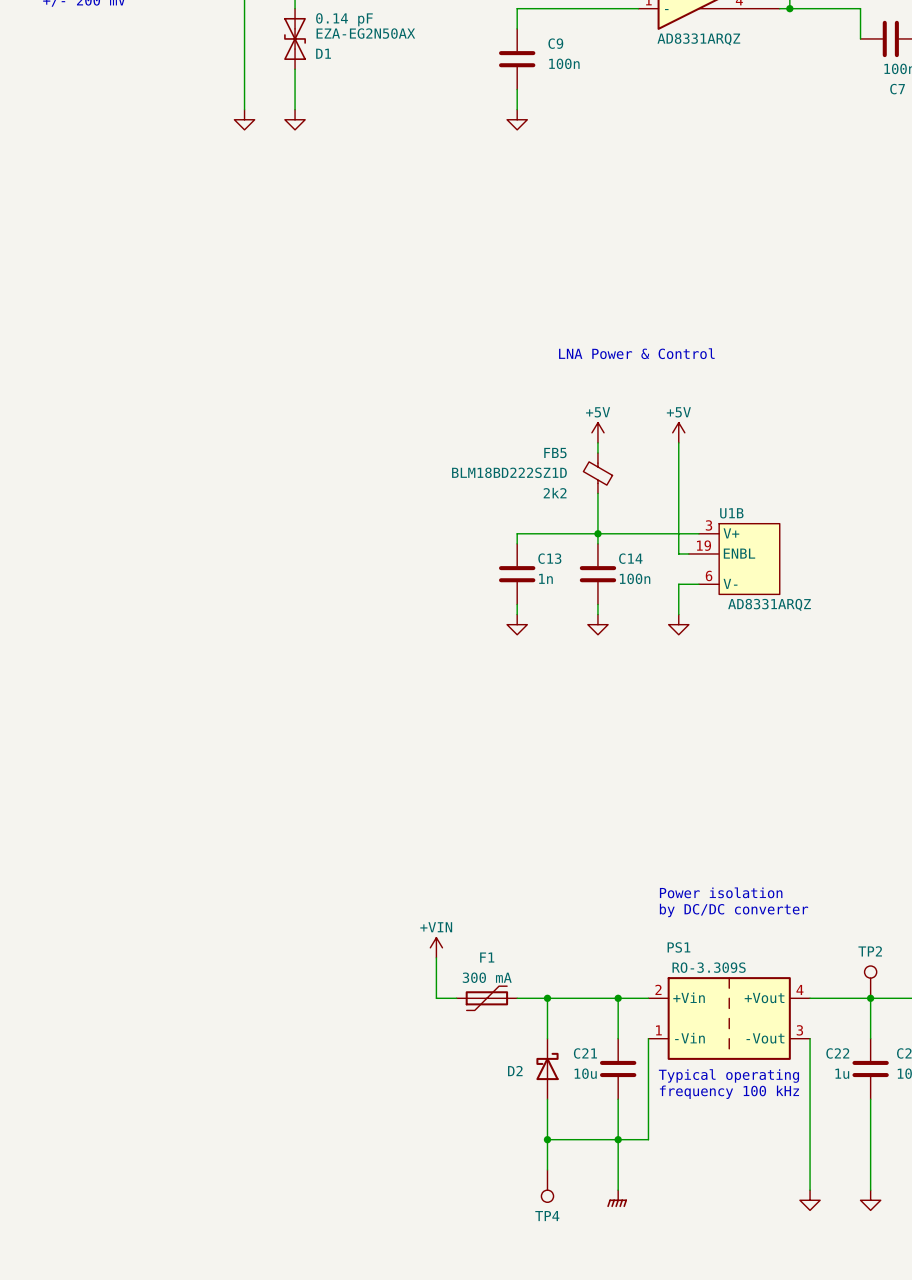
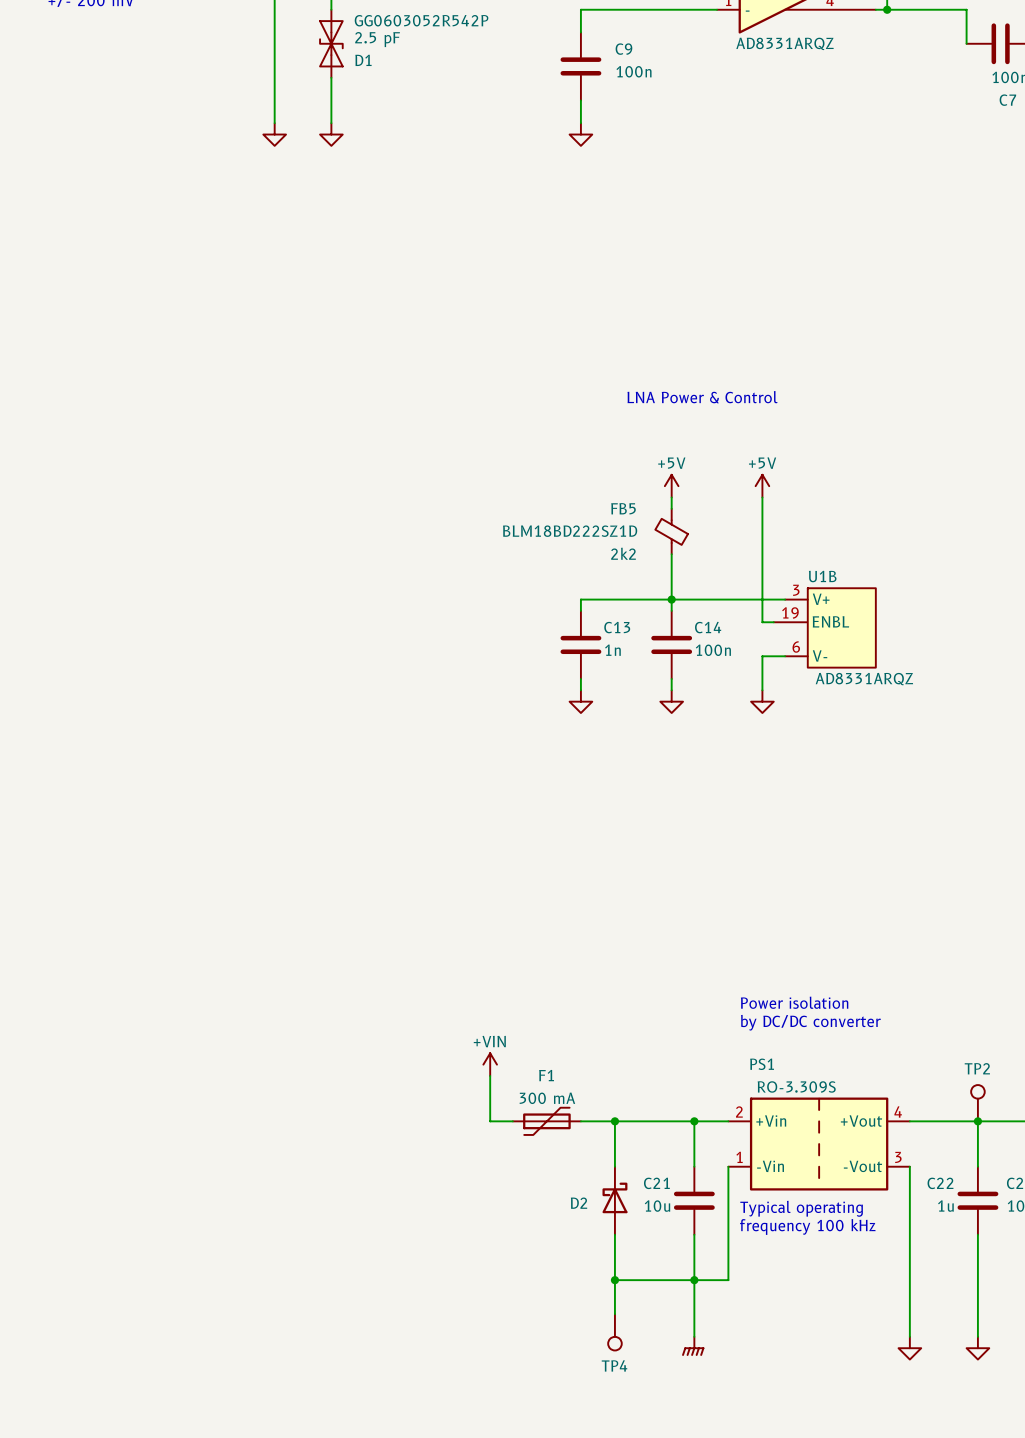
D1 text: none -> GG0603052R542P (421, 20)
D1 text: 0.14 pF (344, 19) -> none
D1 value: EZA-EG2N50AX (365, 33) -> 2.5 pF (377, 39)

